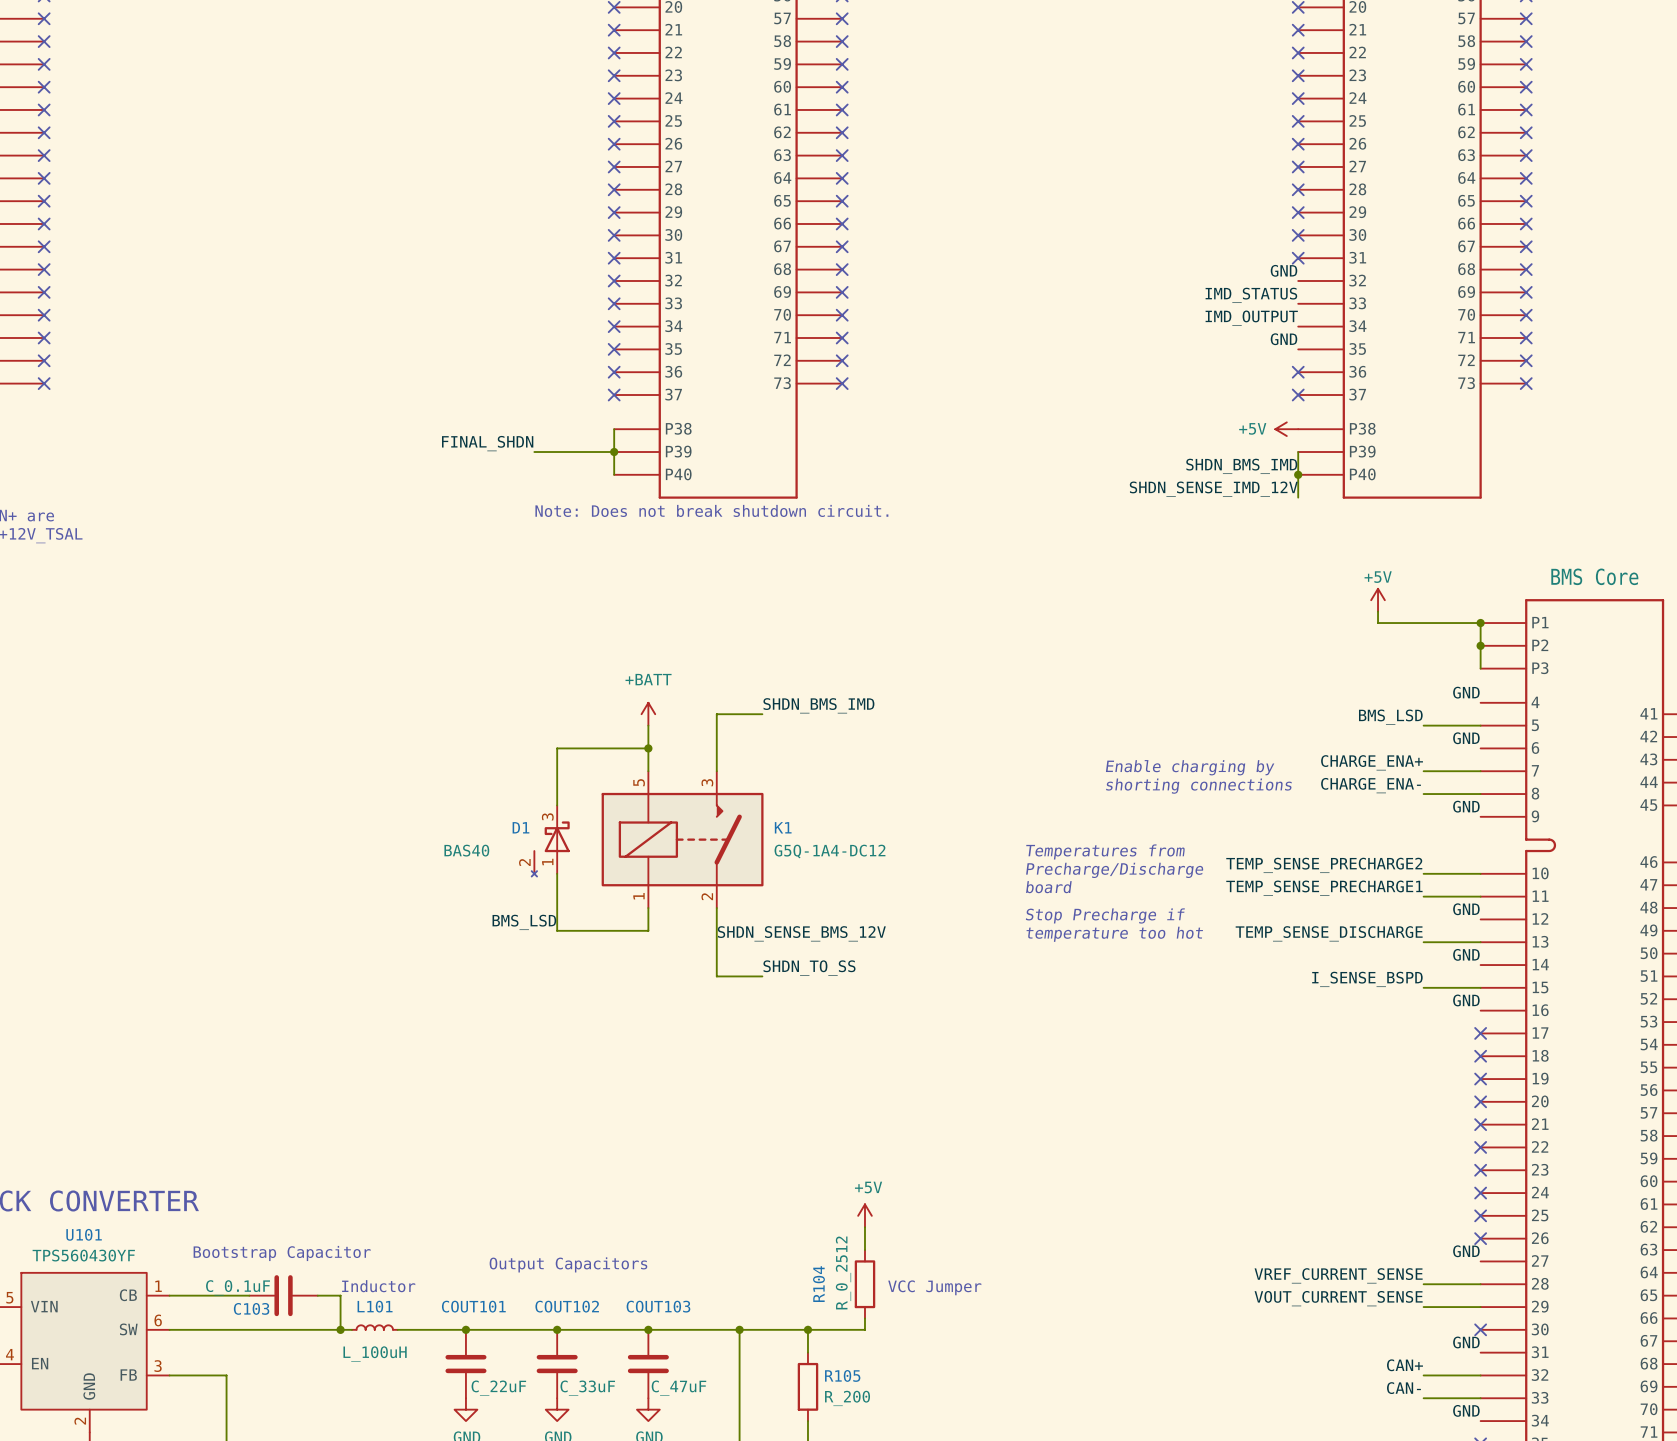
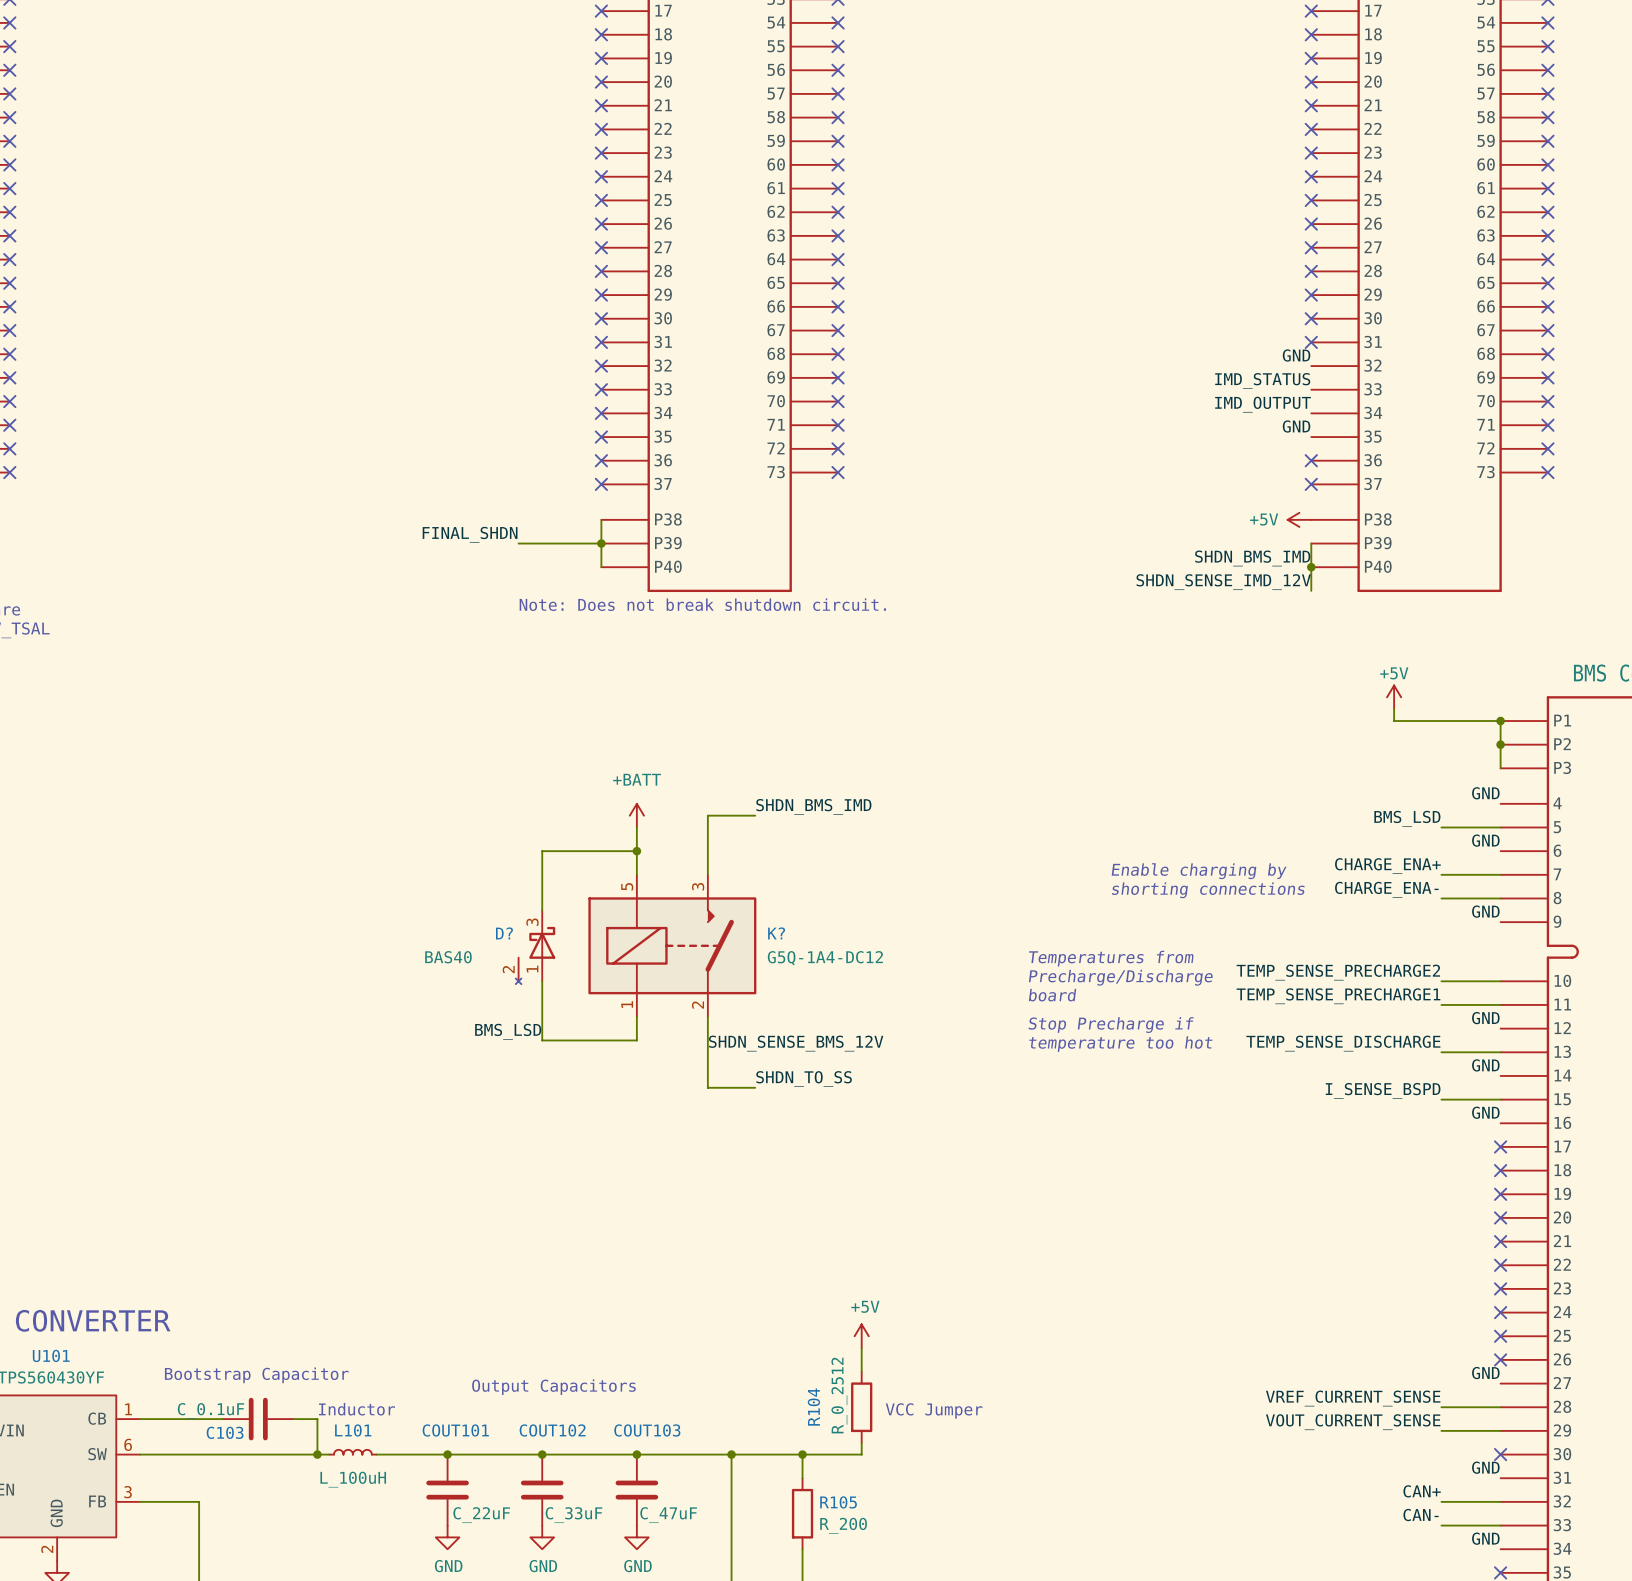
D1 name: D1 (520, 827) -> D? (504, 933)
K1 name: K1 (783, 827) -> K? (776, 933)

